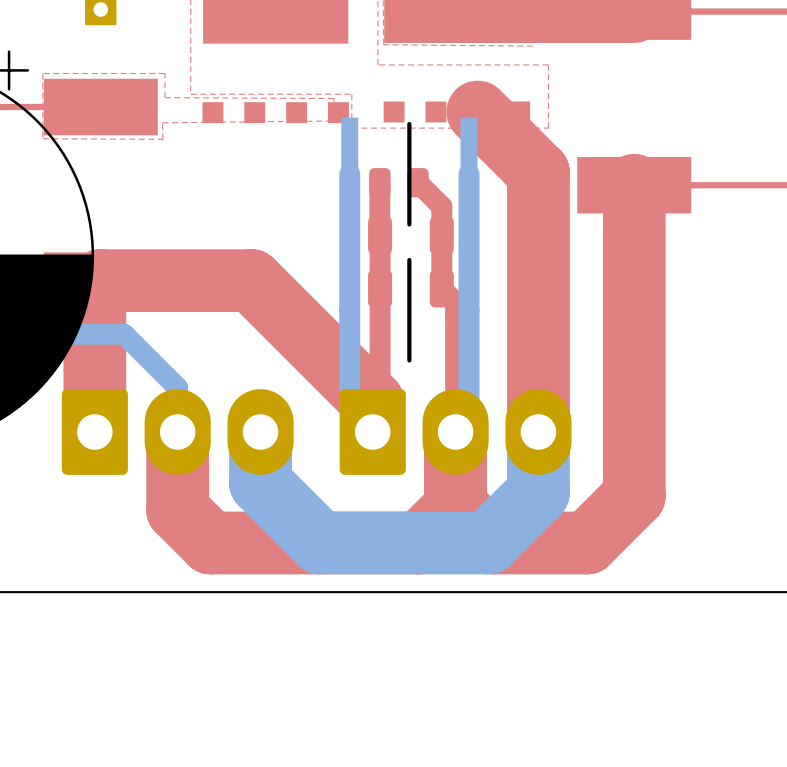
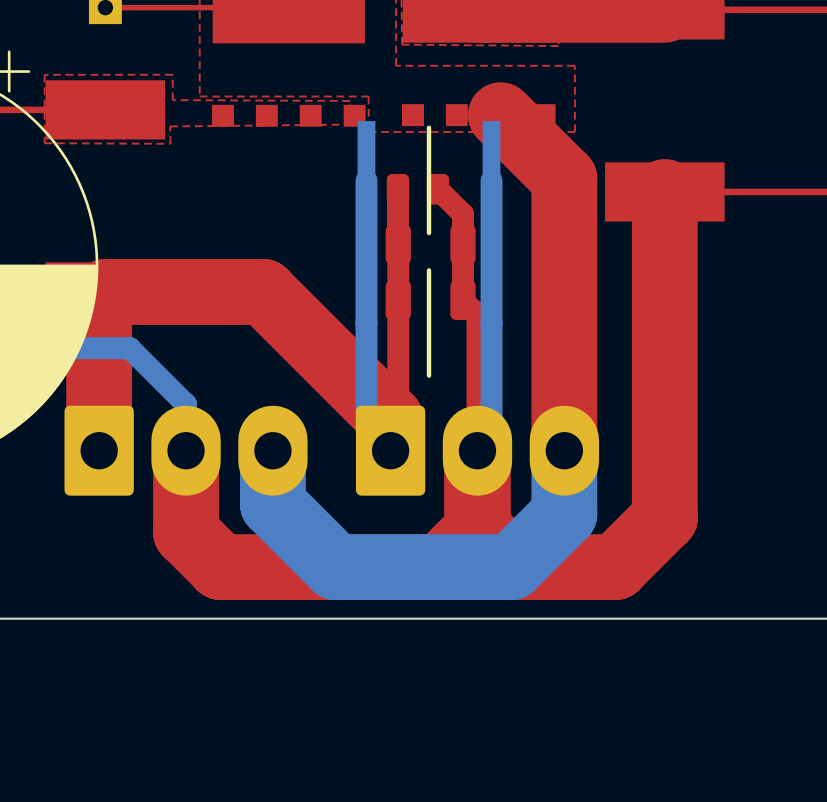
top track: none -> (105, 7) (288, 8)

